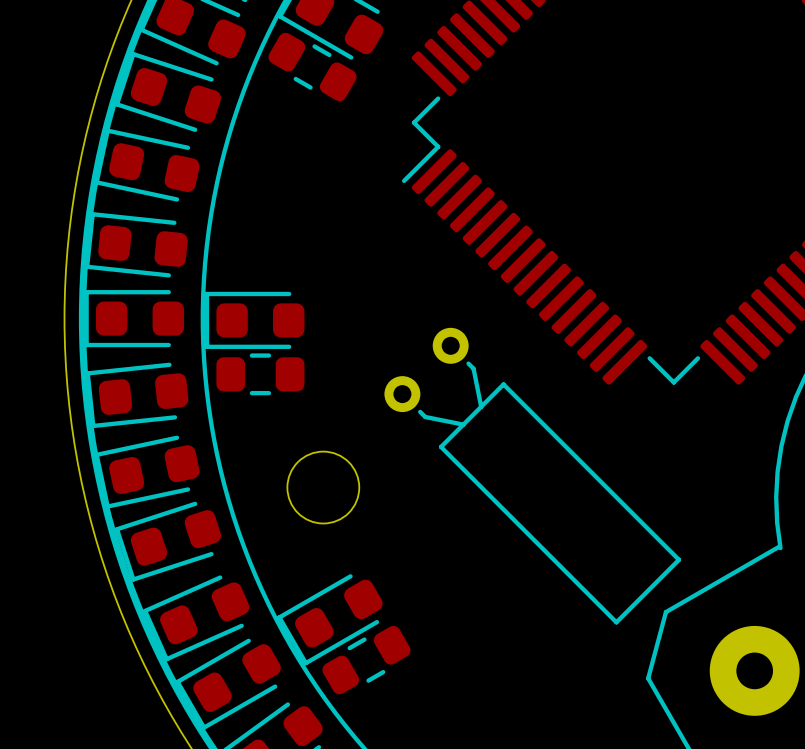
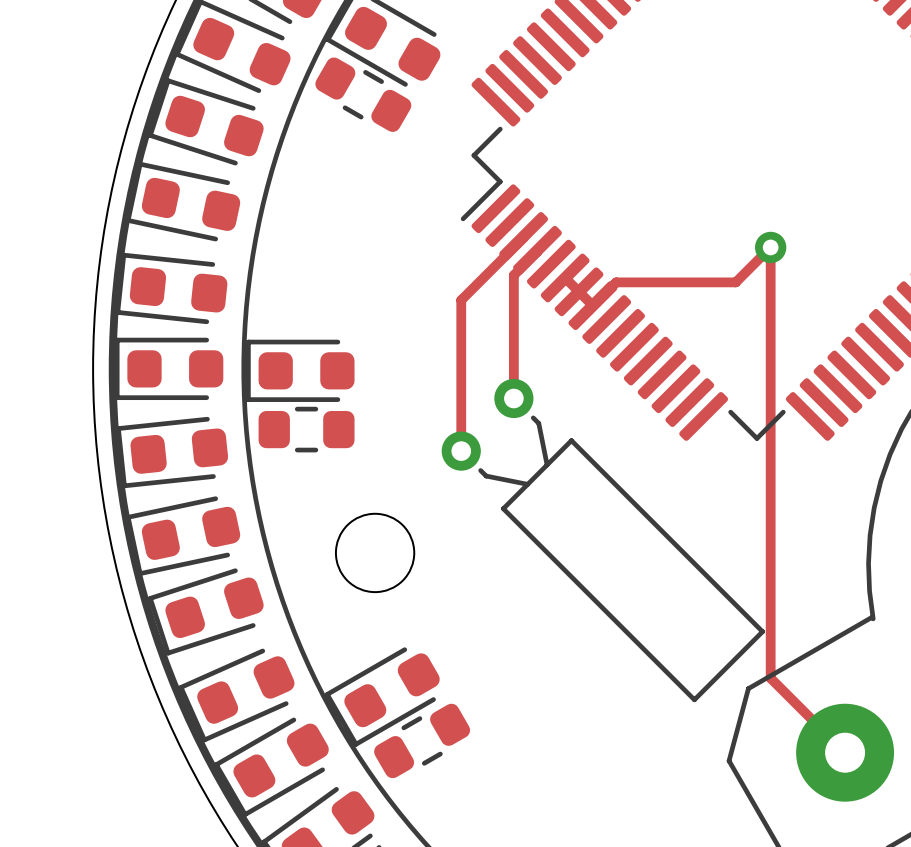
track: none -> (523, 236) (461, 300) (461, 451)
via: none -> (770, 247)
track: none -> (537, 250) (513, 275) (513, 398)
track: none -> (565, 277) (592, 305) (616, 282) (735, 282) (770, 247) (770, 678) (845, 752)

